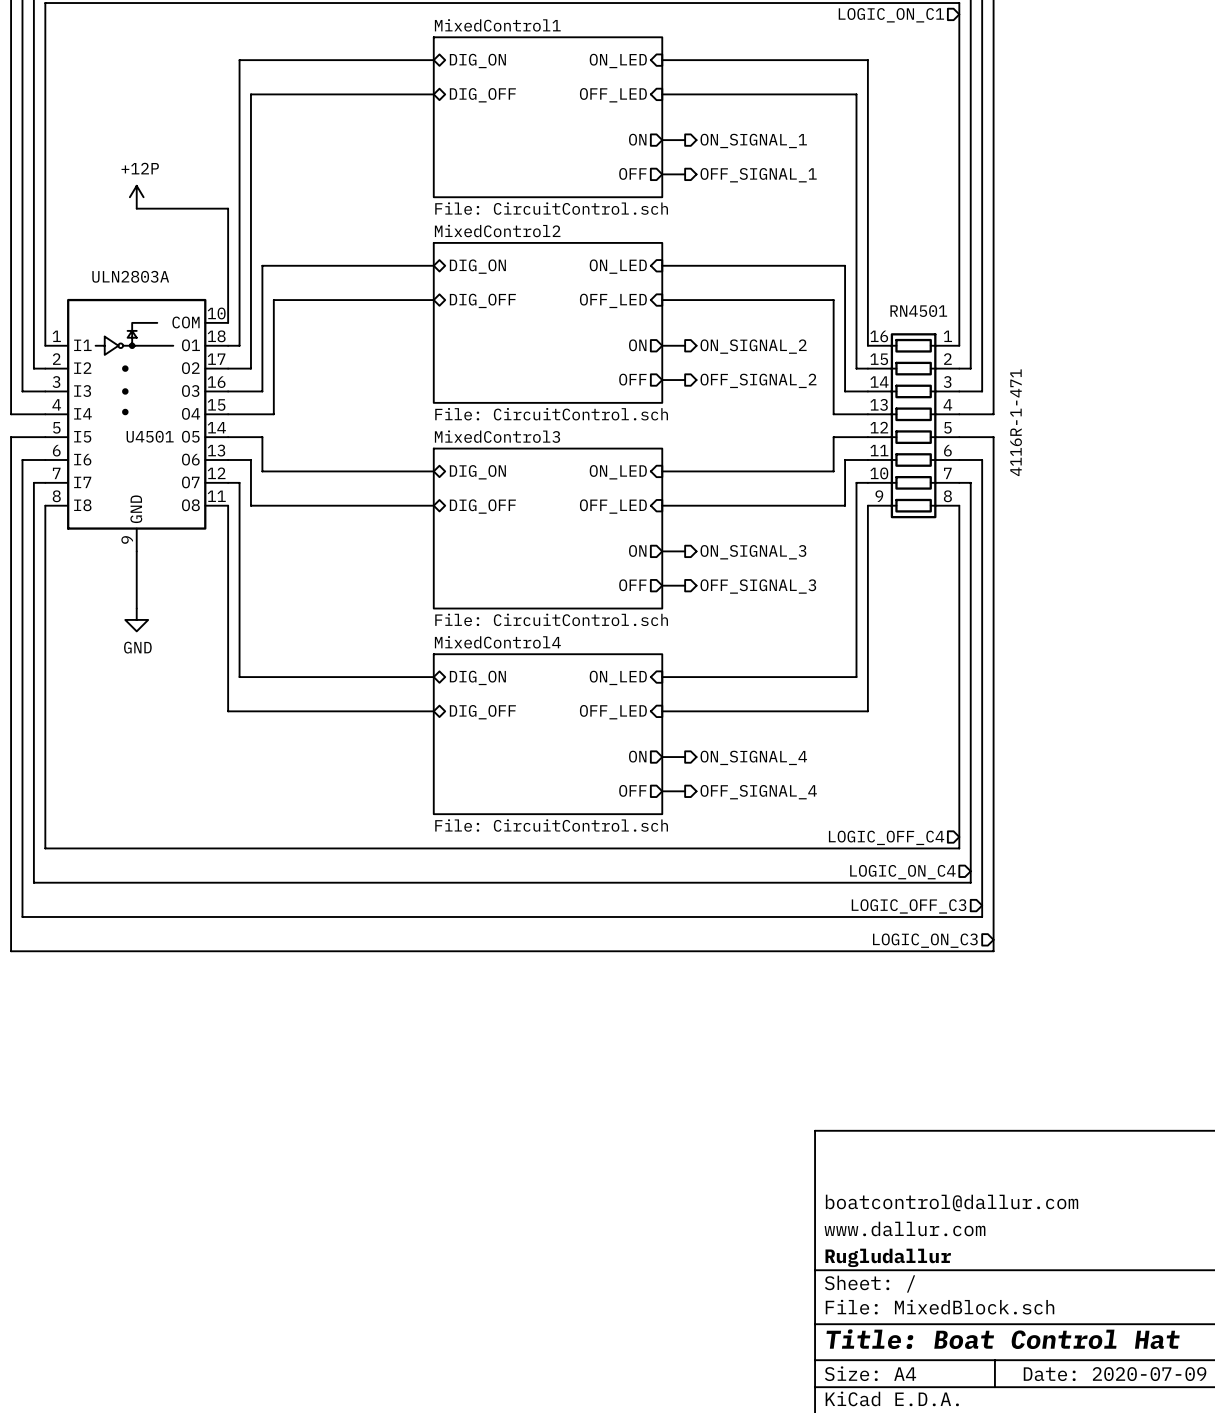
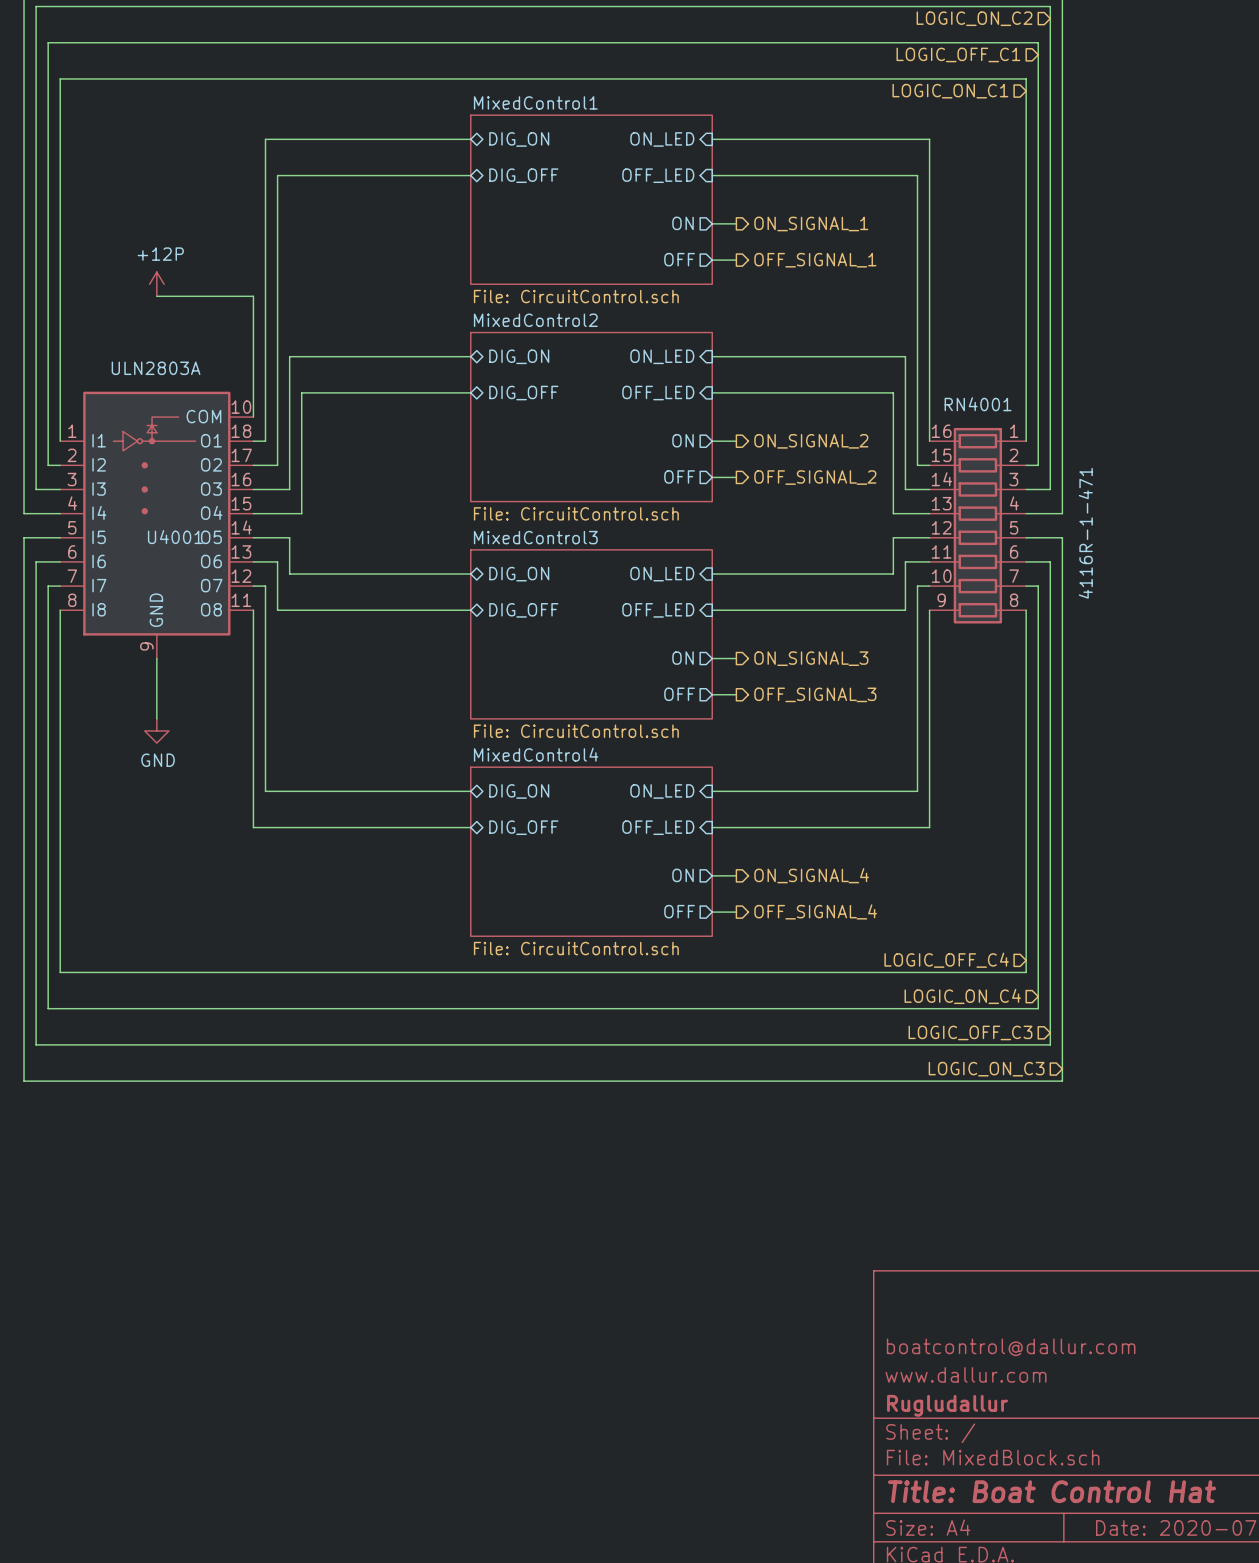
RN4501 name: RN4501 (918, 311) -> RN4001 (978, 404)
U4501 name: U4501 (150, 436) -> U4001 (175, 537)

